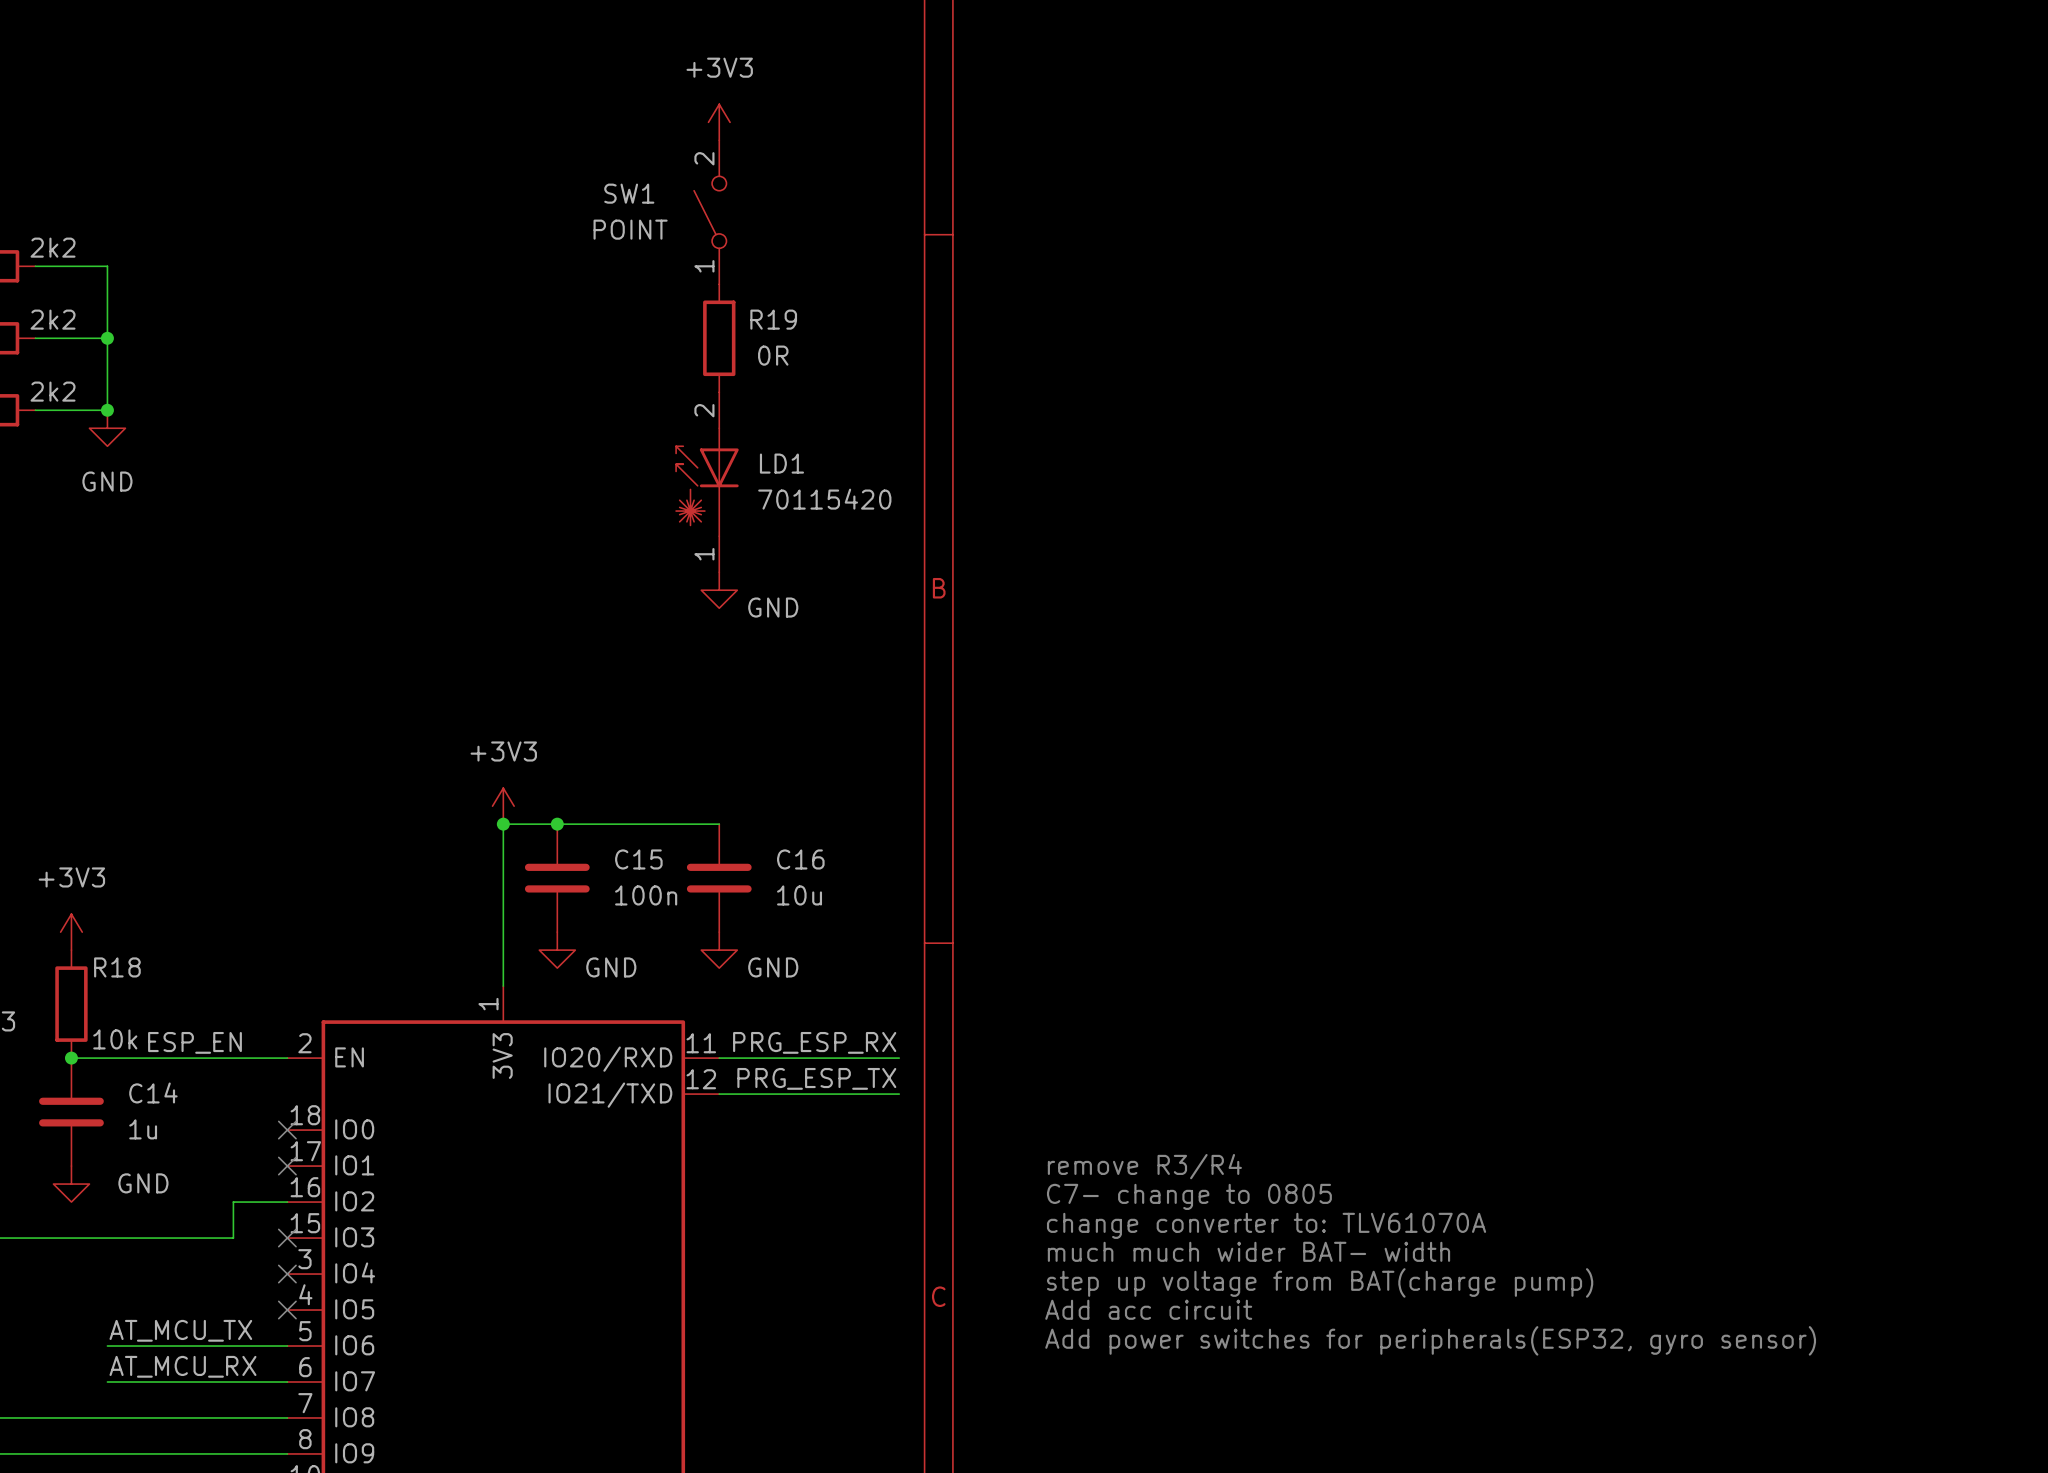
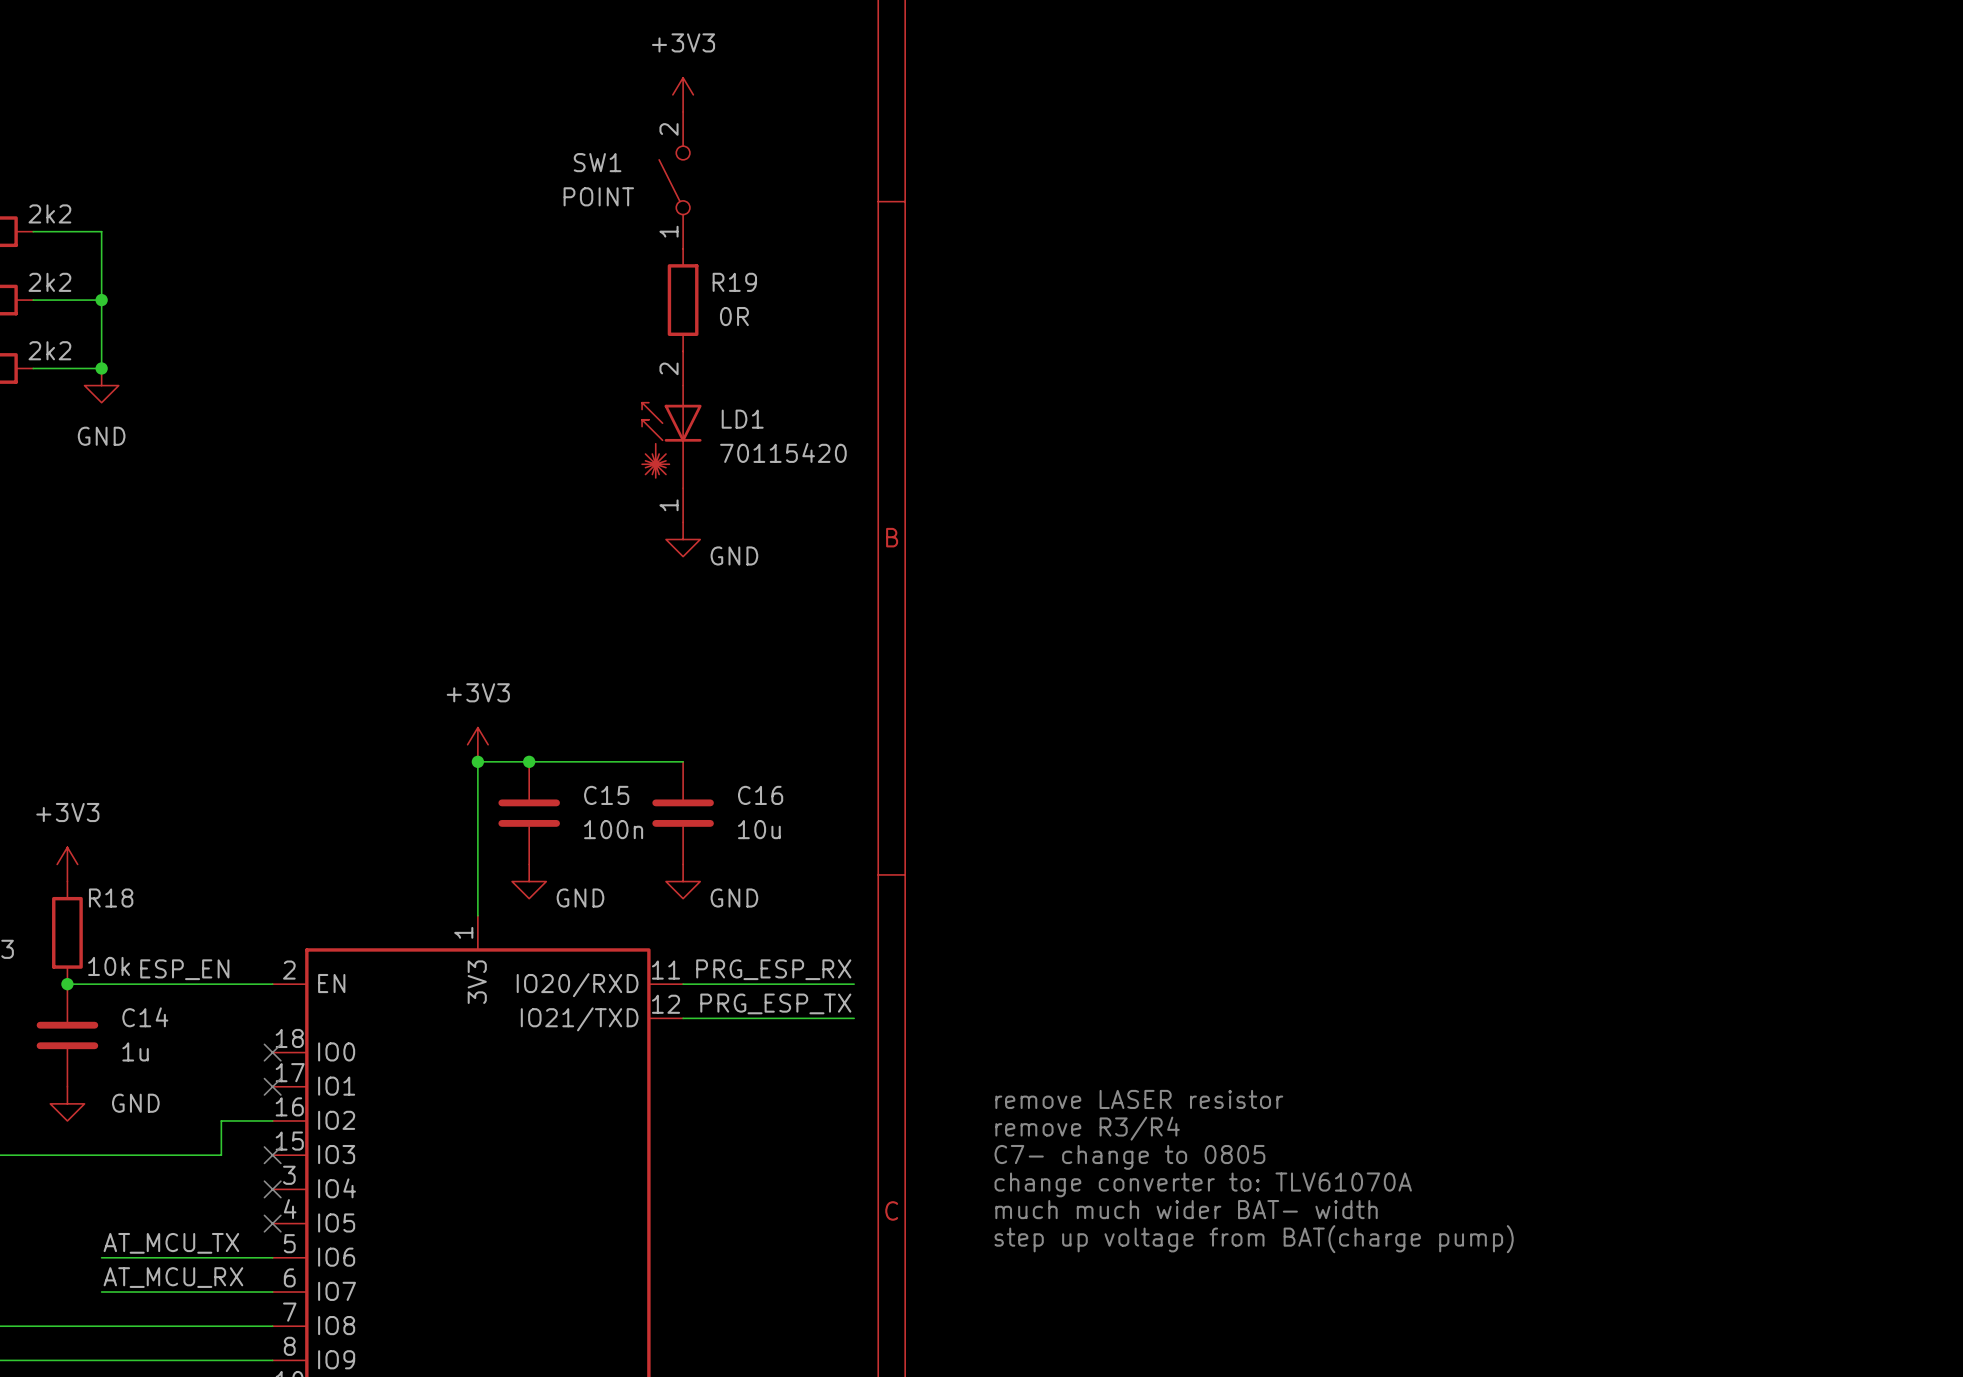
text position: remove R3/R4 (1144, 1166) -> remove R3/R4 (1087, 1128)
text: none -> remove LASER resistor (1139, 1099)
text position: C7- change to 0805 (1189, 1196) -> C7- change to 0805 (1129, 1157)
text position: change converter to: TLV61070A (1266, 1225) -> change converter to: TLV61070A (1203, 1184)
text position: much much wider BAT- width (1248, 1251) -> much much wider BAT- width (1186, 1209)
text position: step up voltage from BAT(charge pump) (1320, 1282) -> step up voltage from BAT(charge pump) (1254, 1239)
text: Add acc circuit (1148, 1309) -> none
text: Add power switches for peripherals(ESP32, gyro sensor) (1430, 1340) -> none

